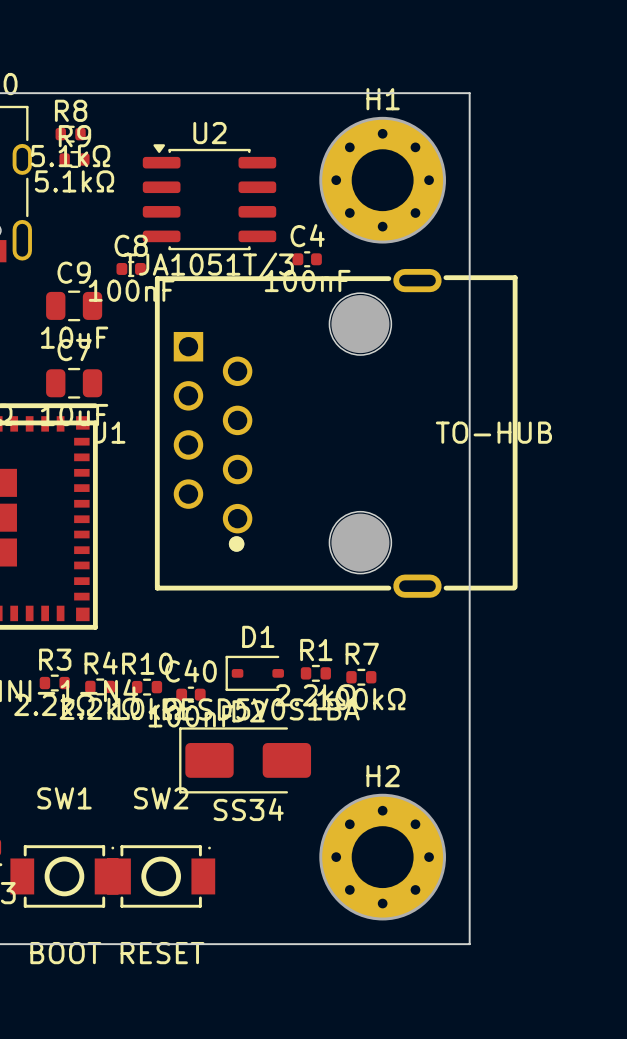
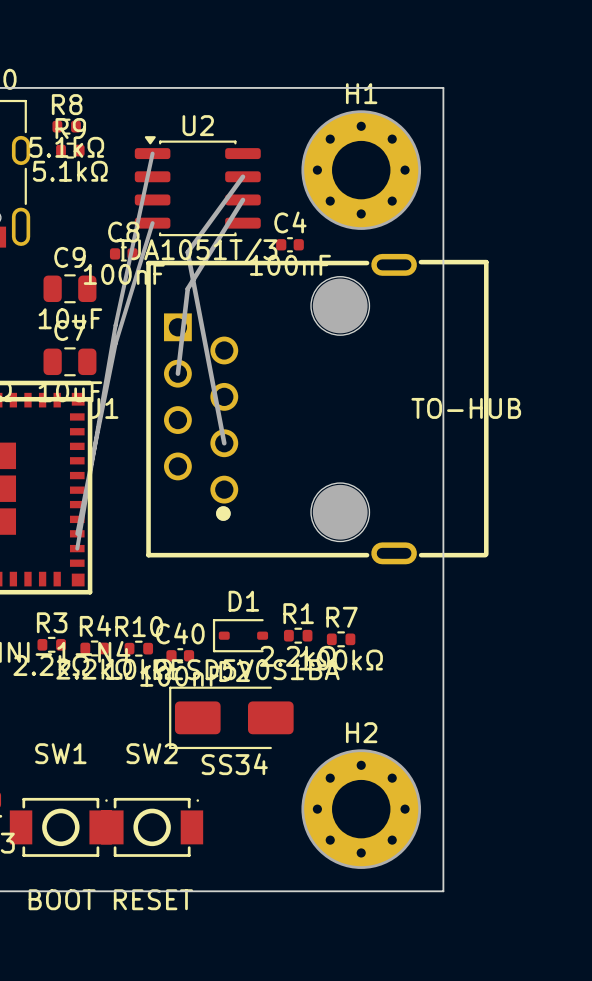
line: none -> (152, 153) (115, 325) (77, 548)
line: none -> (242, 176) (187, 252) (224, 443)
line: none -> (242, 199) (187, 288) (177, 373)
line: none -> (152, 223) (115, 343) (77, 533)

